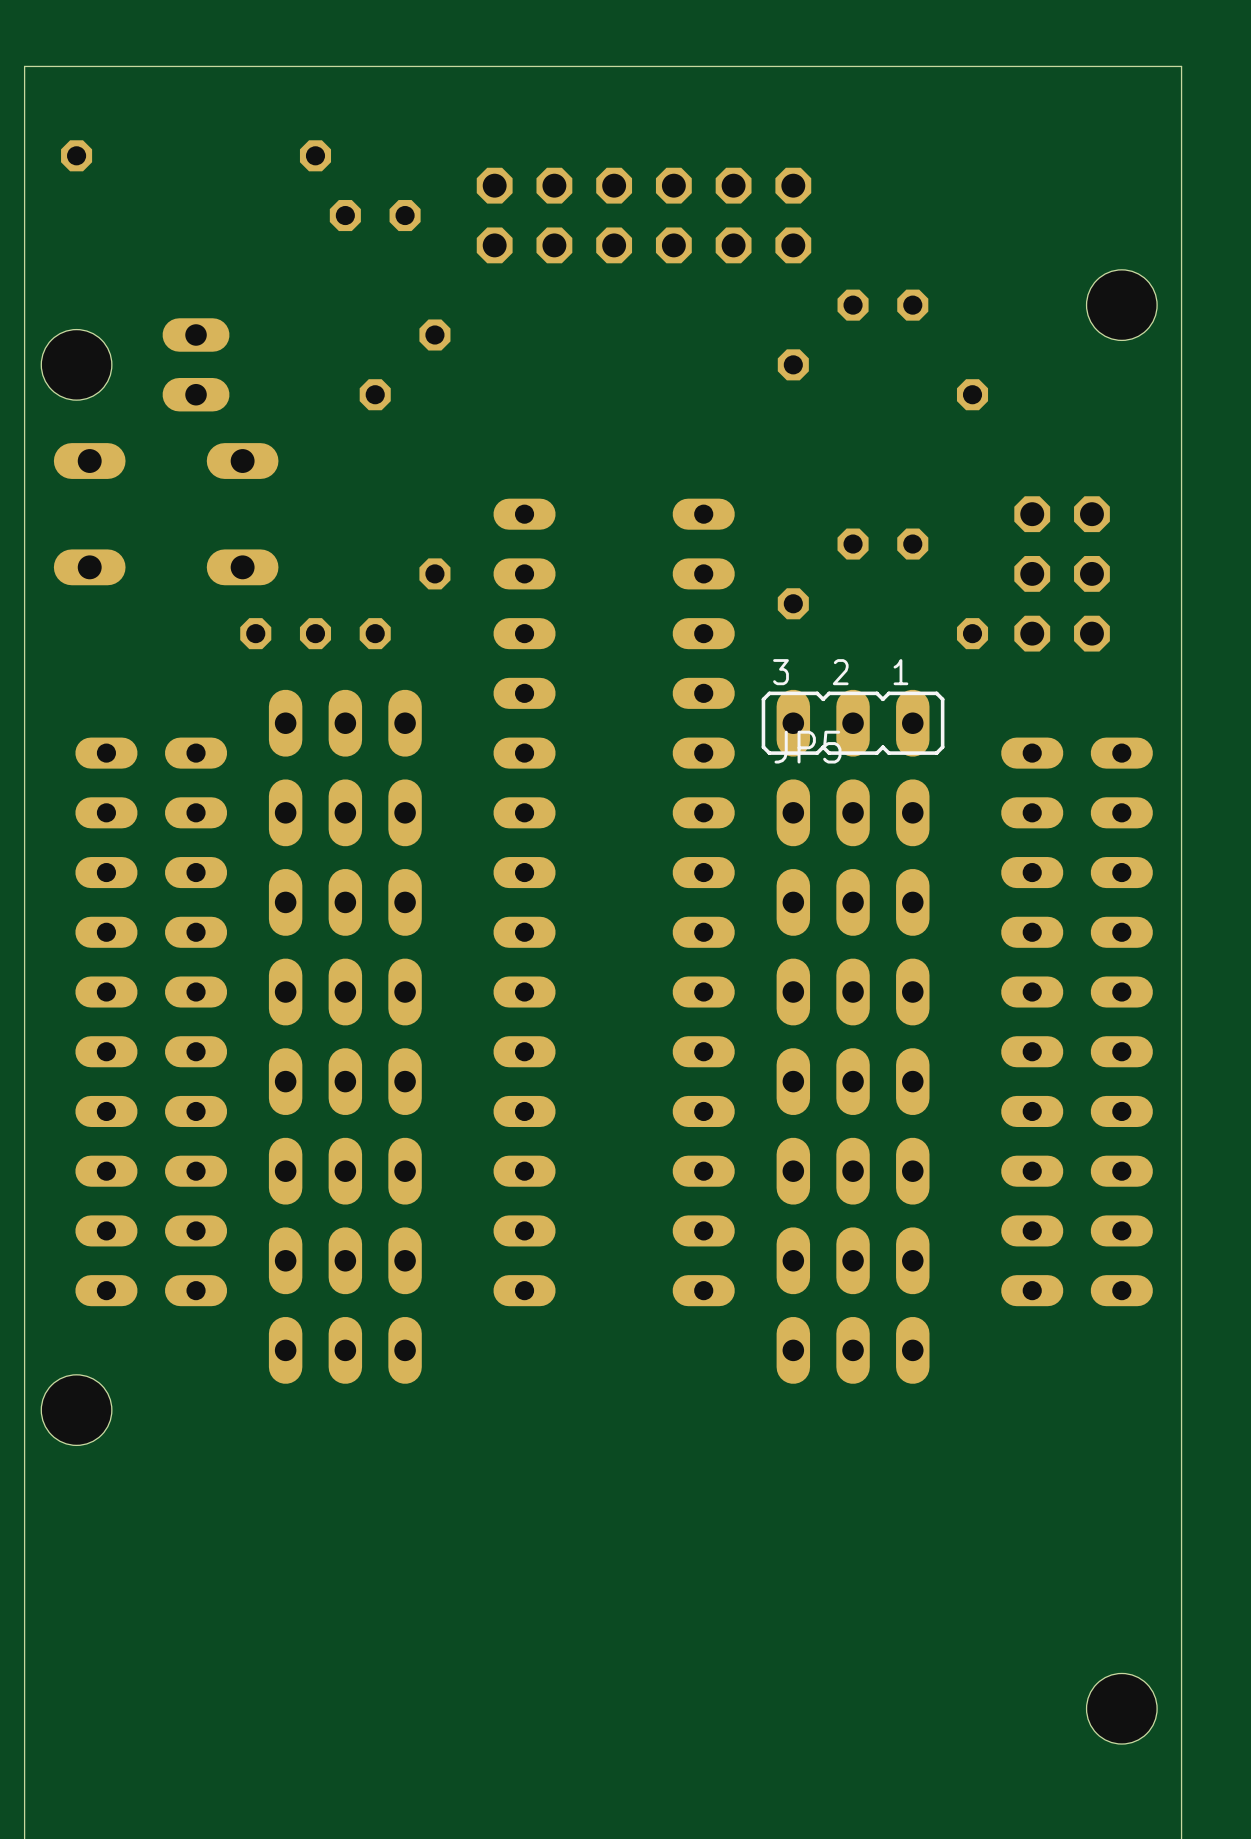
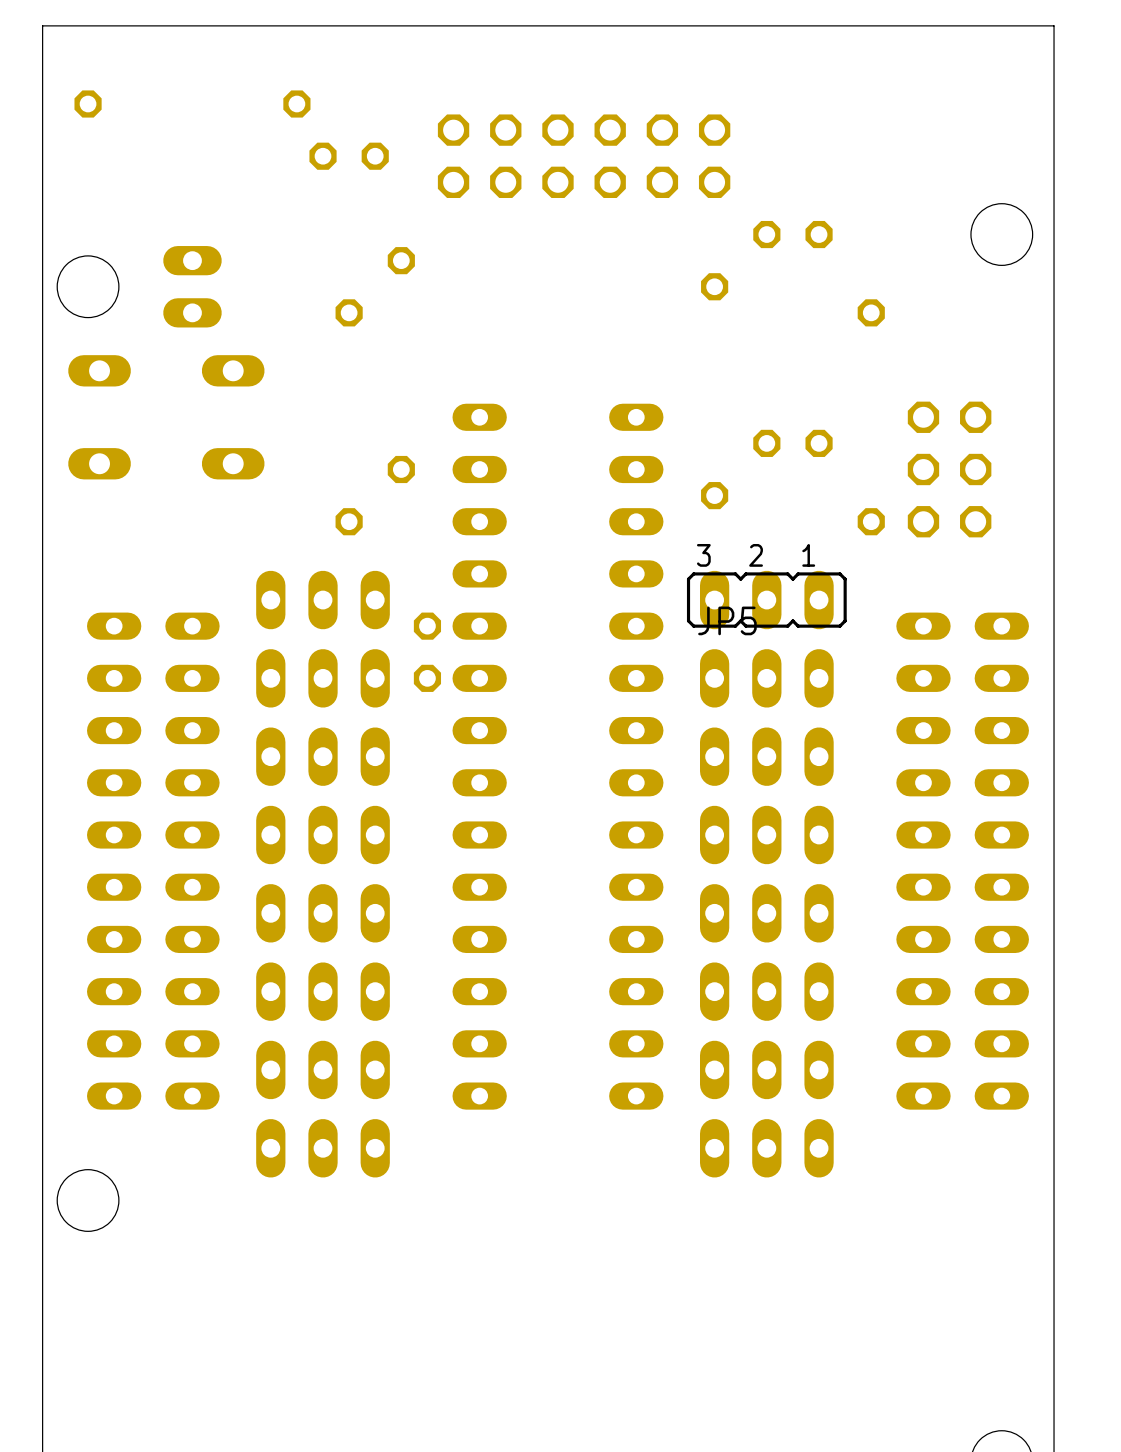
part rotation: 0° (285, 633) -> 90° clockwise (427, 652)
part position: (285, 633) -> (427, 652)

